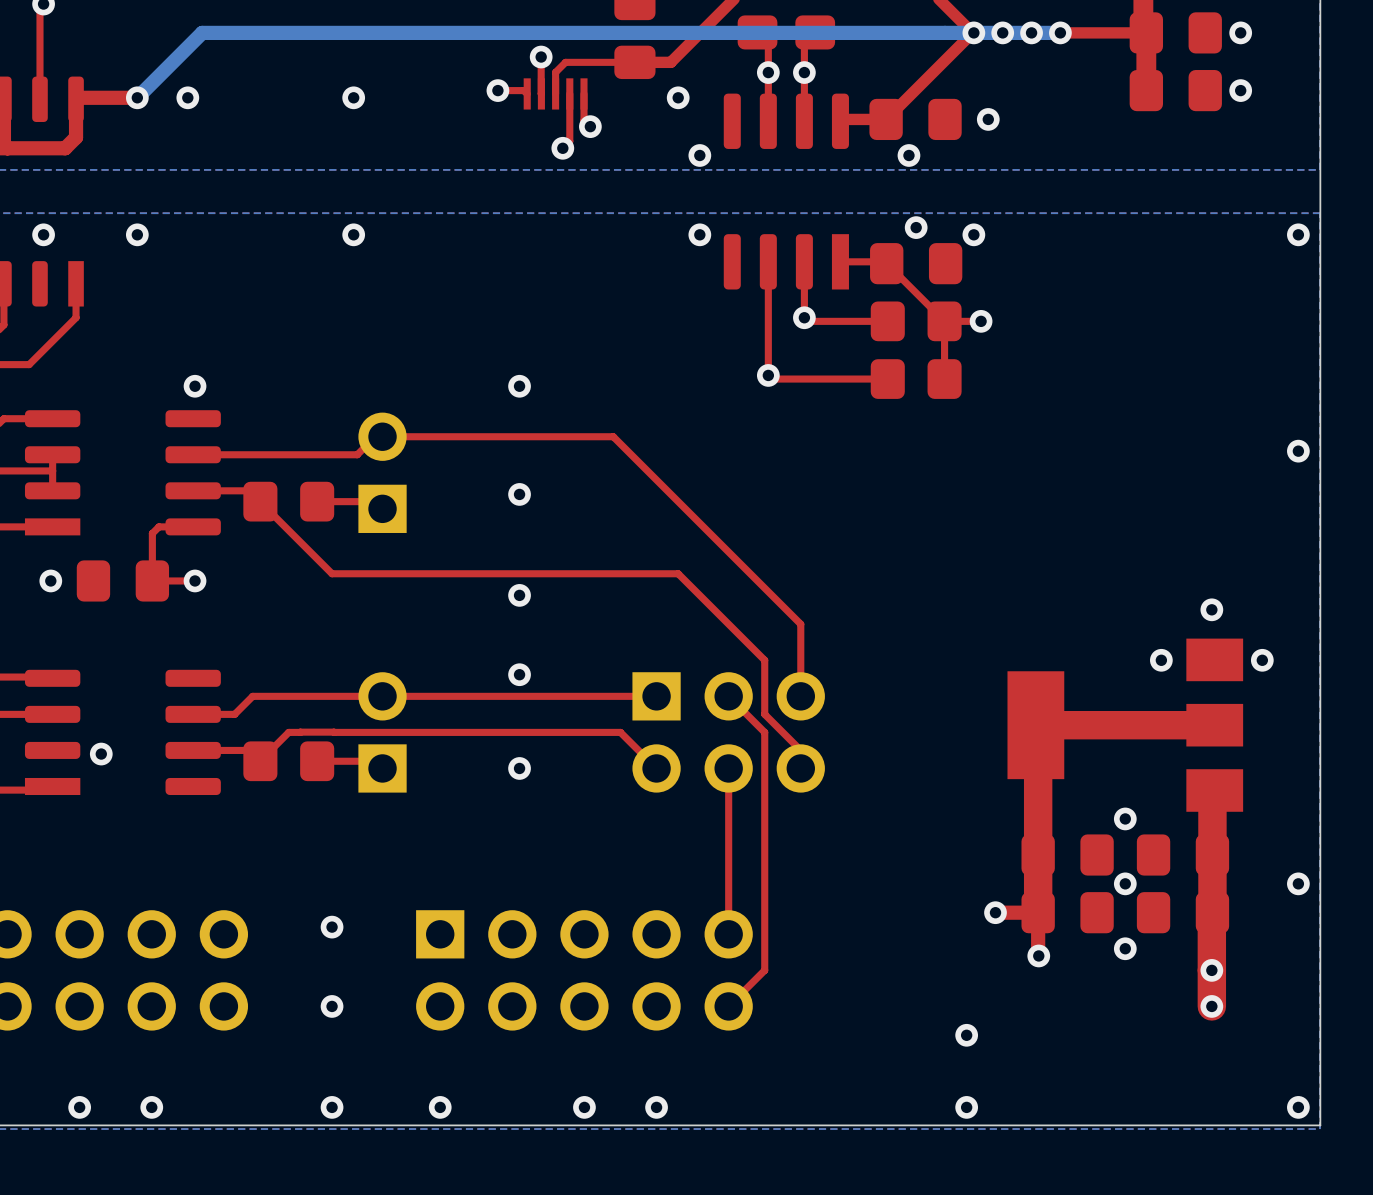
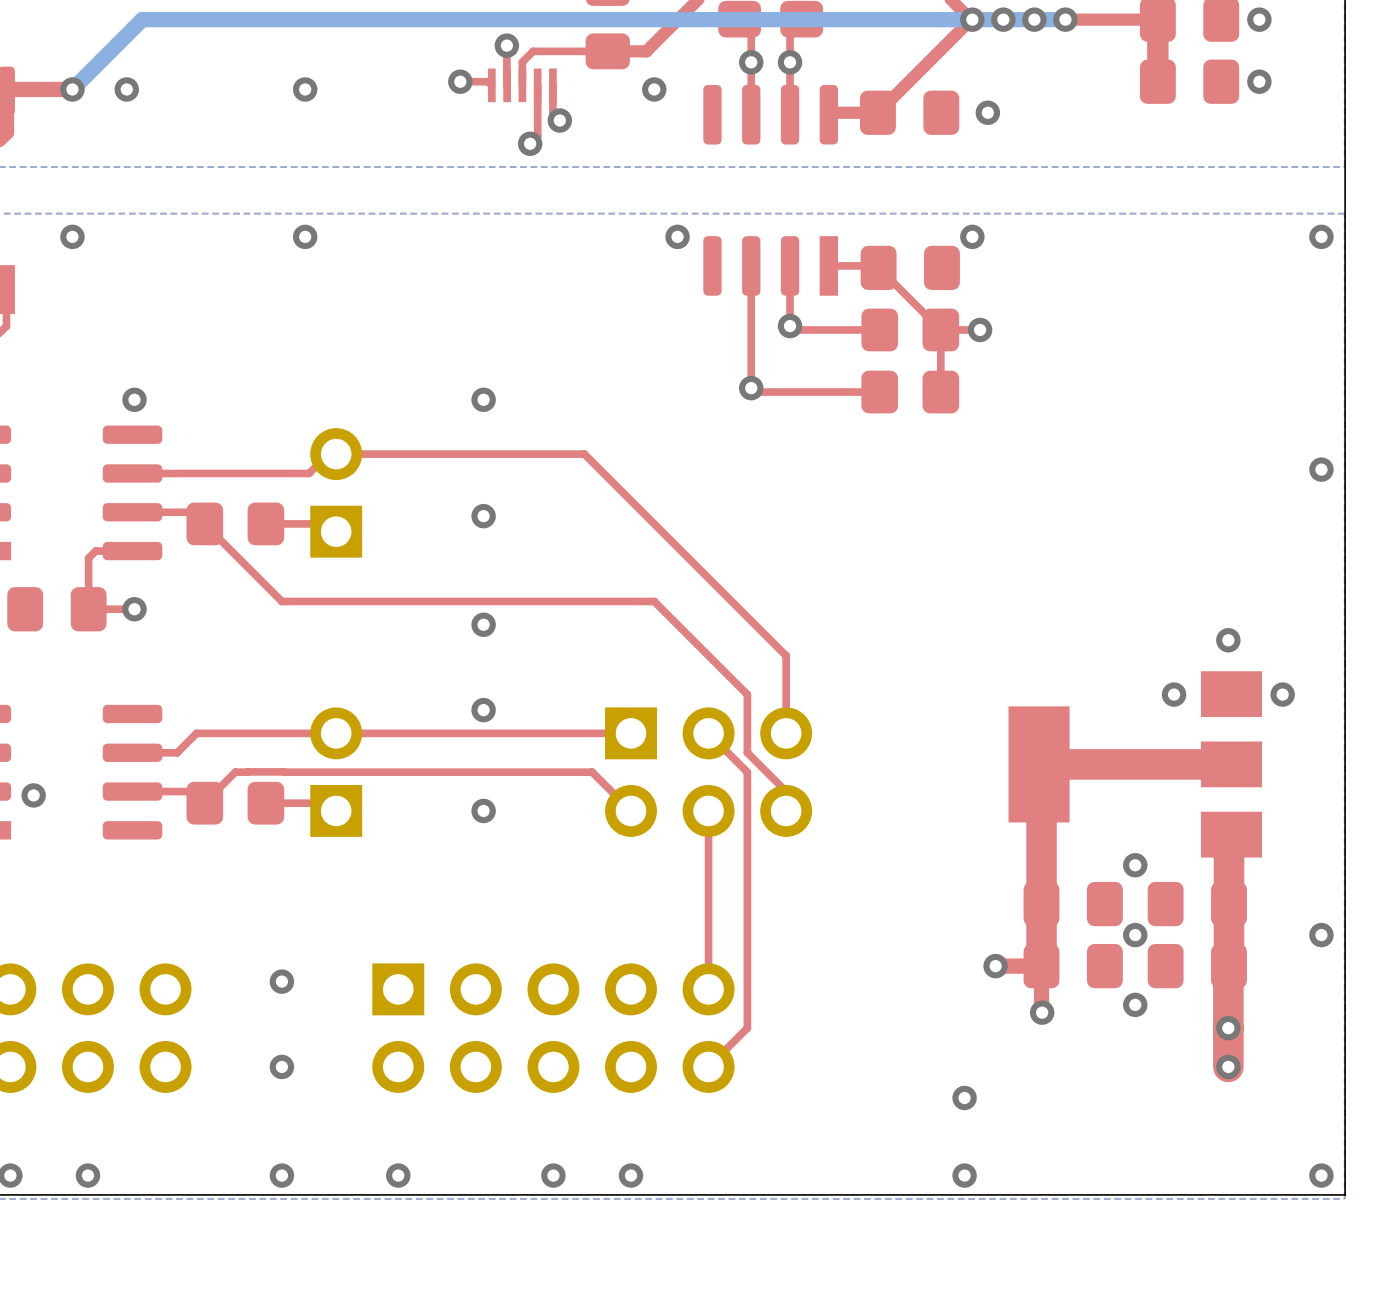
via: (699, 155) -> none
via: (908, 155) -> none
via: (916, 227) -> none

